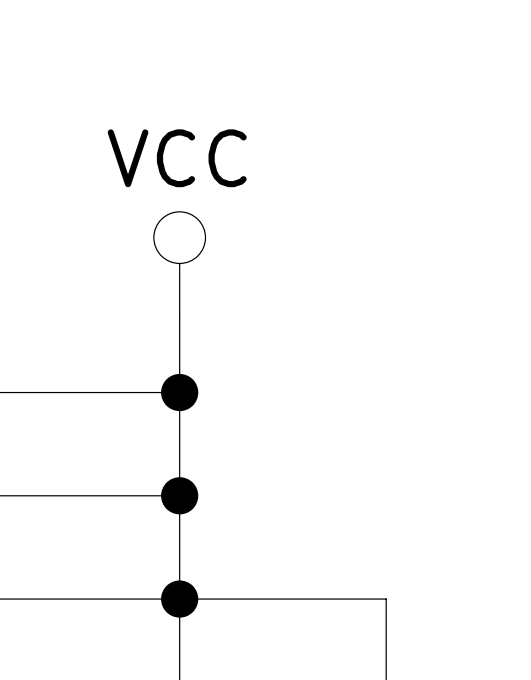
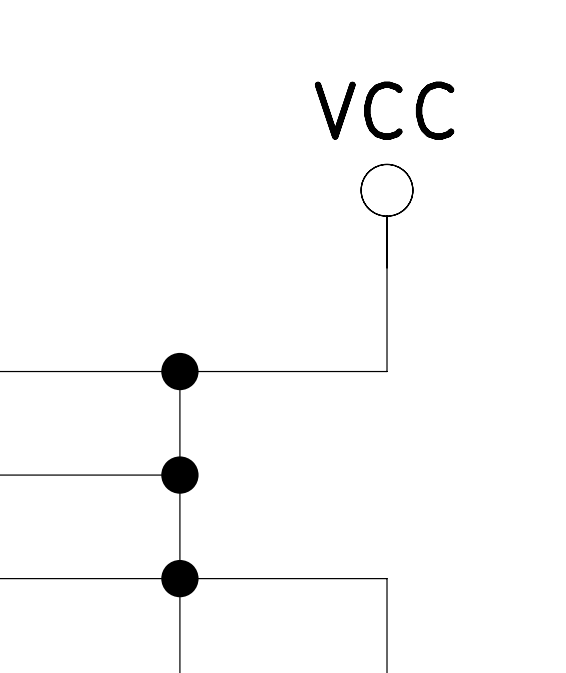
power symbol position: VCC (179, 263) -> VCC (387, 216)
wire: (179, 315) (179, 392) -> (387, 267) (387, 371) (179, 371)

